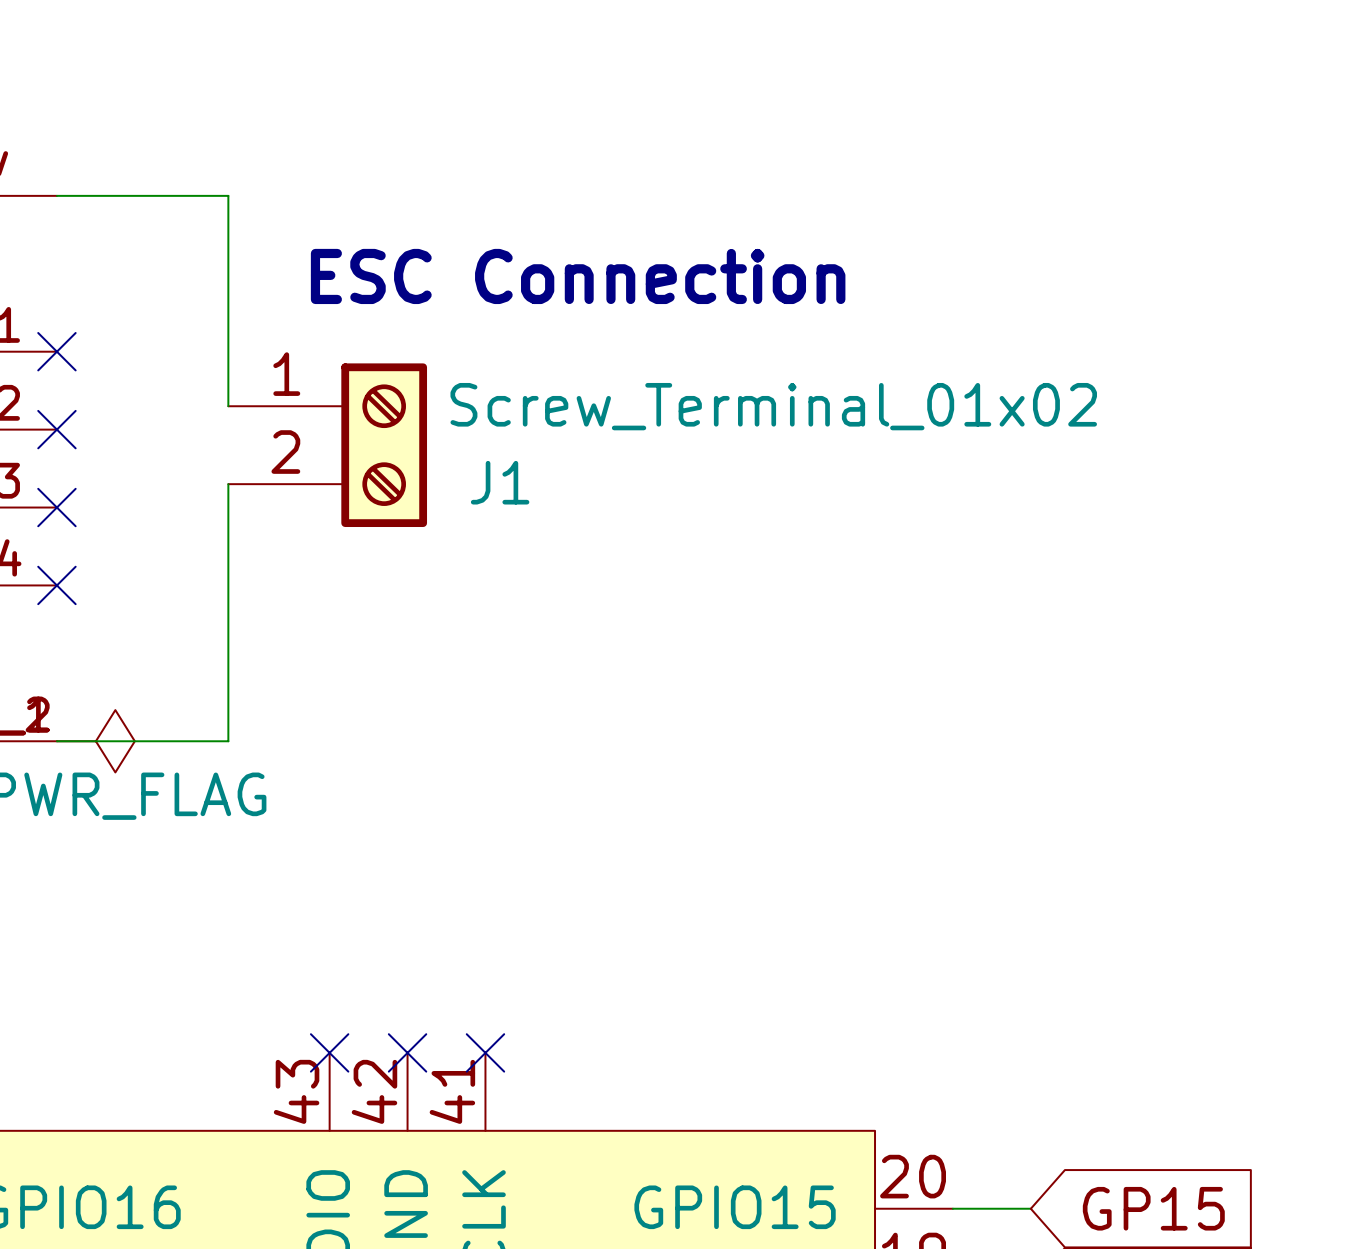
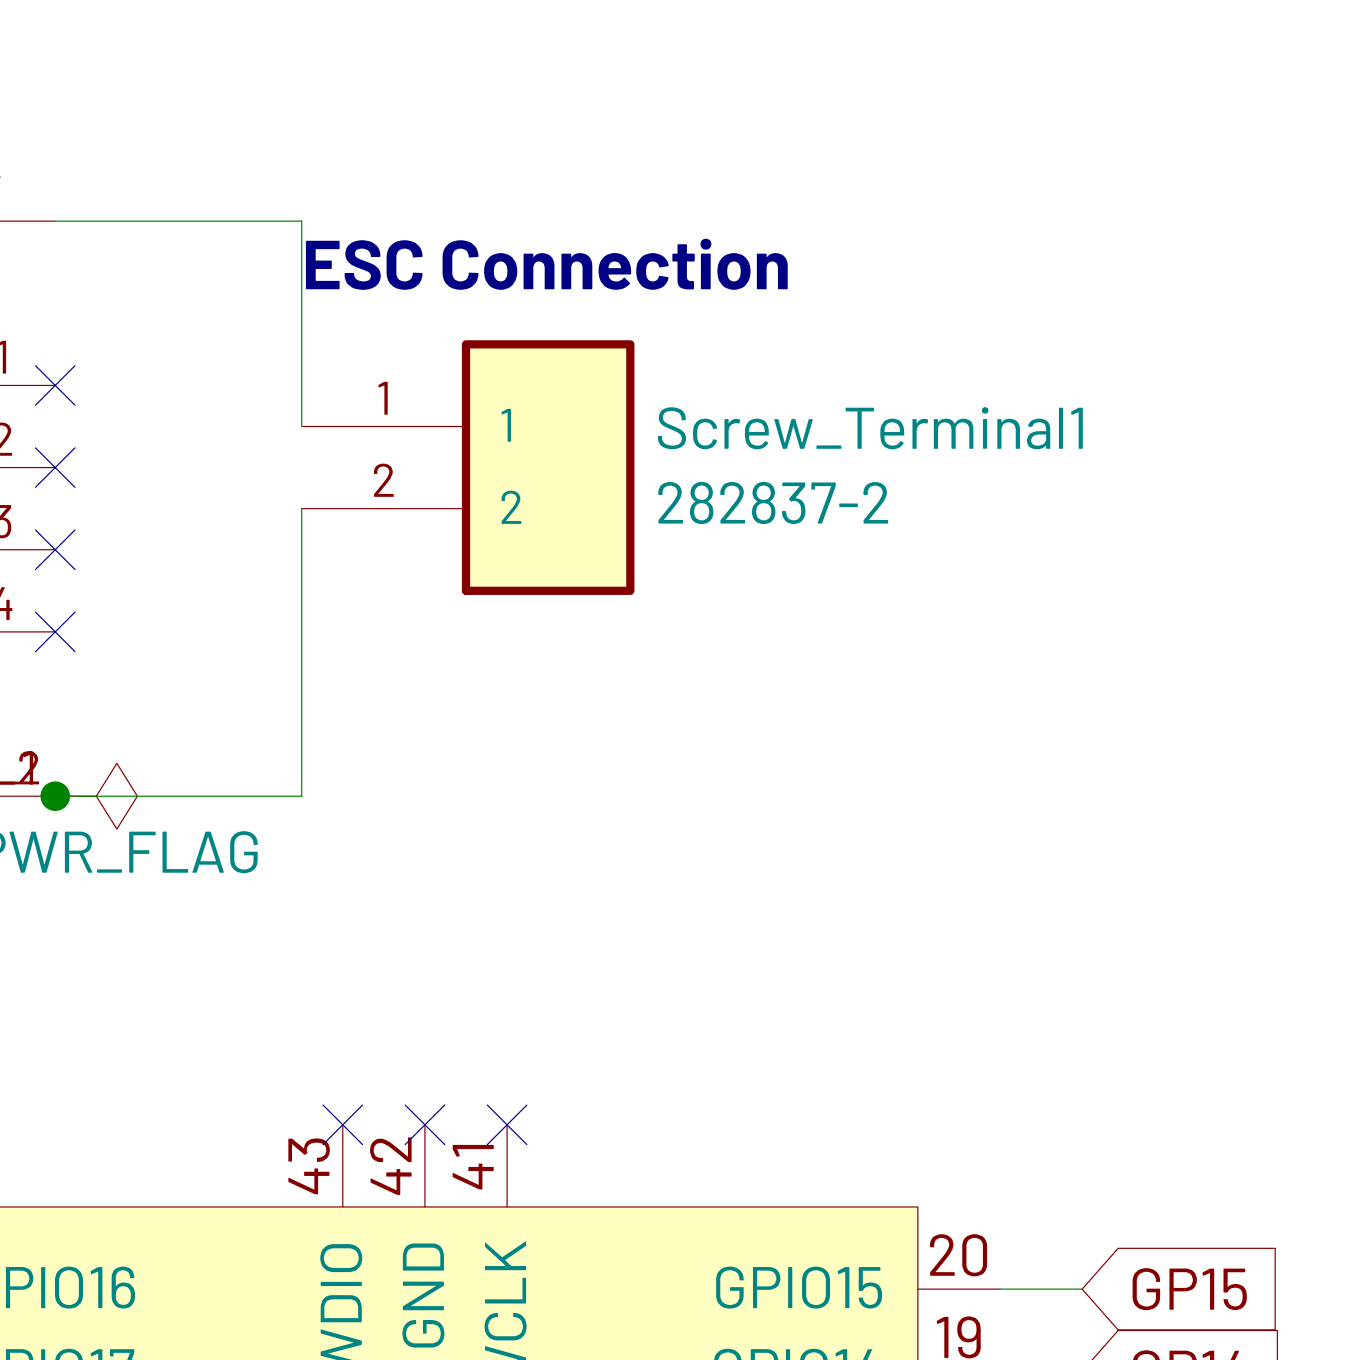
wire: (228, 195) (228, 406) -> (235, 221) (301, 221) (301, 426)
text position: ESC Connection (578, 276) -> ESC Connection (546, 264)
Screw_Terminal1: none -> 282837-2 (468, 467)
J1: Screw_Terminal_01x02 (327, 445) -> none
wire: (228, 484) (228, 741) -> (301, 508) (301, 796) (235, 796)
junction: none -> (55, 796)

